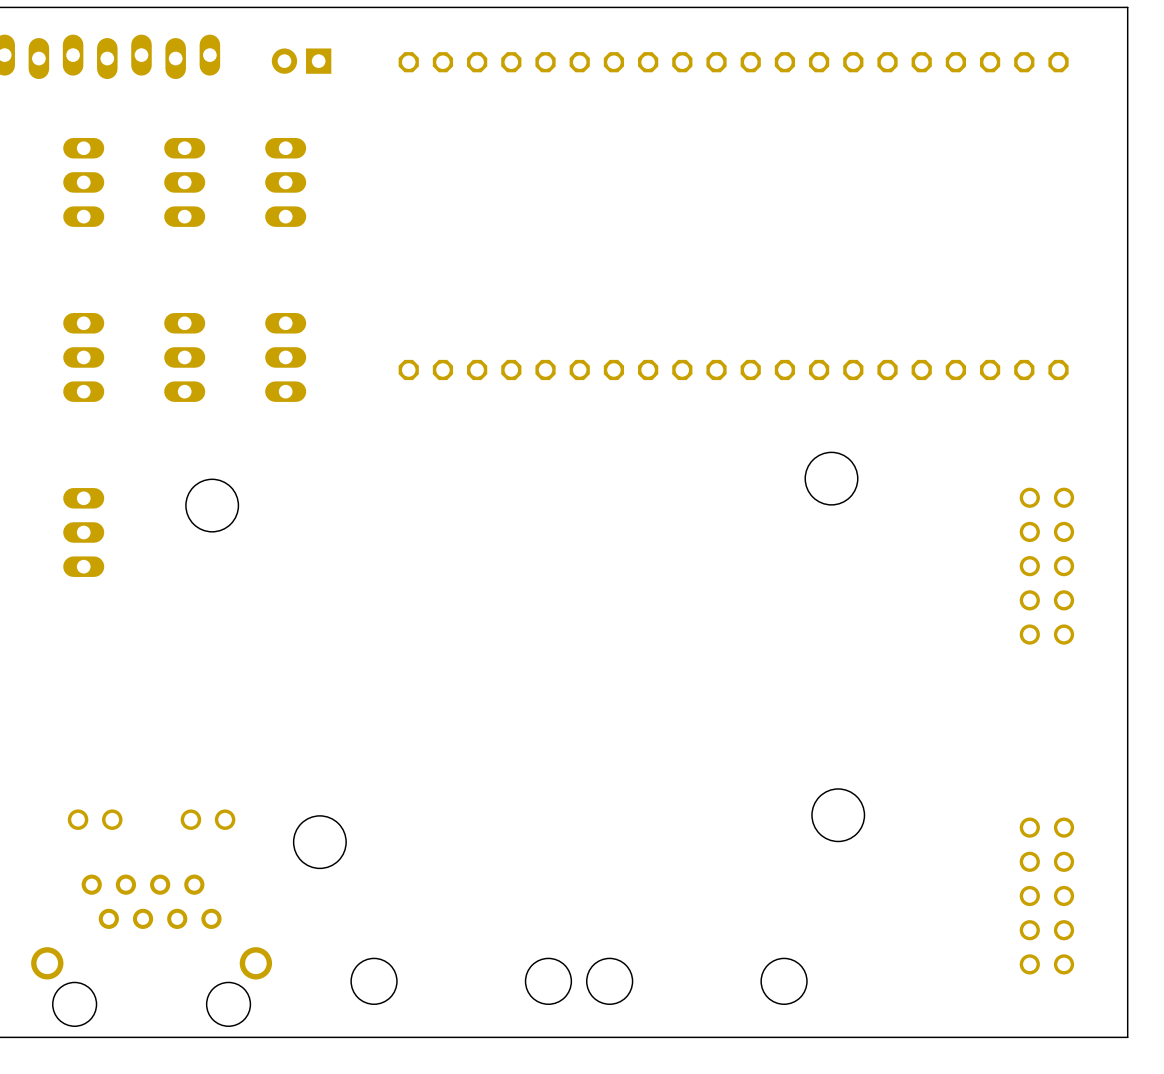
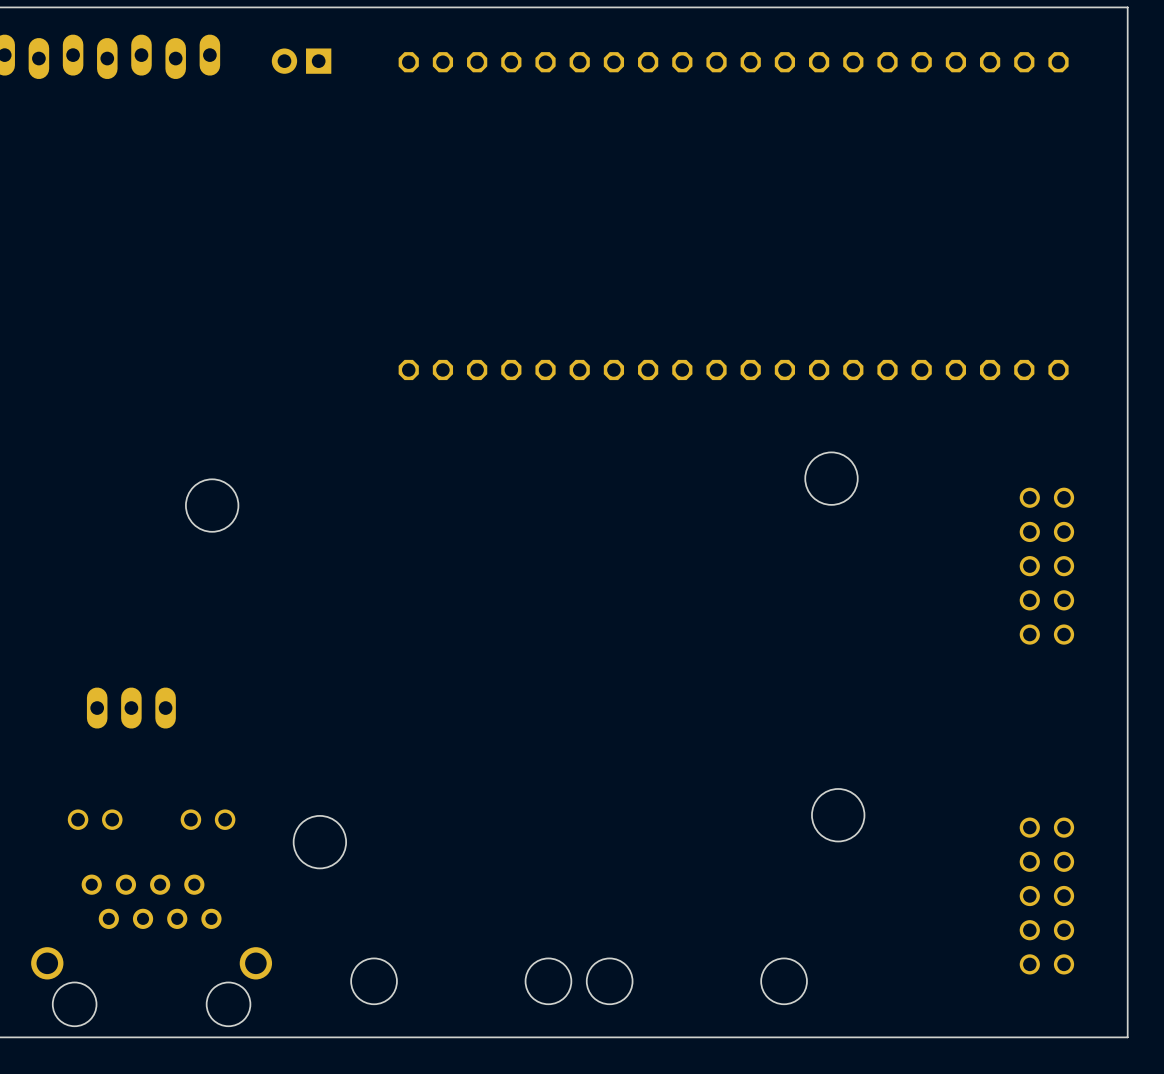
part: (83, 182) -> none
part: (184, 182) -> none
part: (285, 182) -> none
part: (83, 357) -> none
part: (184, 357) -> none
part: (285, 357) -> none
part: (83, 532) -> none
part: none -> (131, 708)

